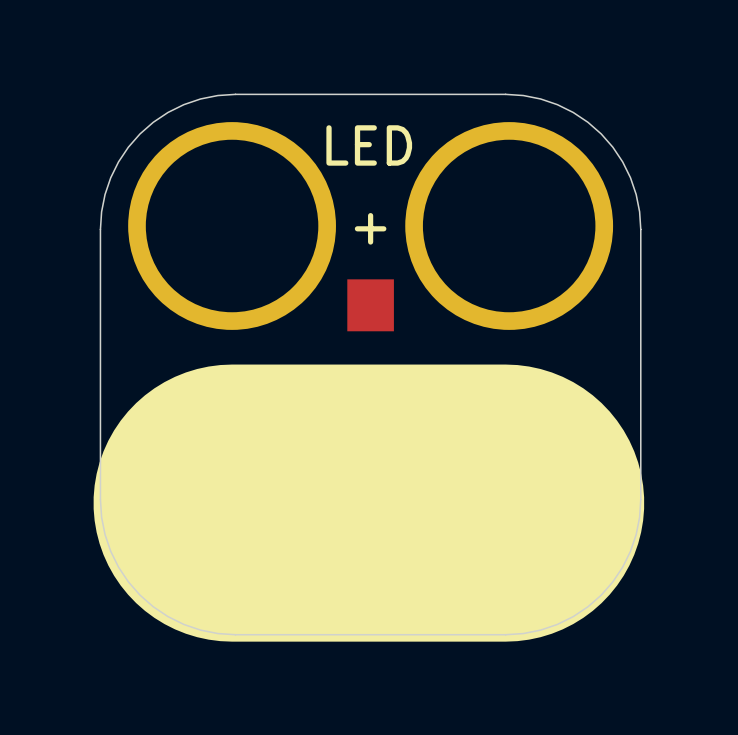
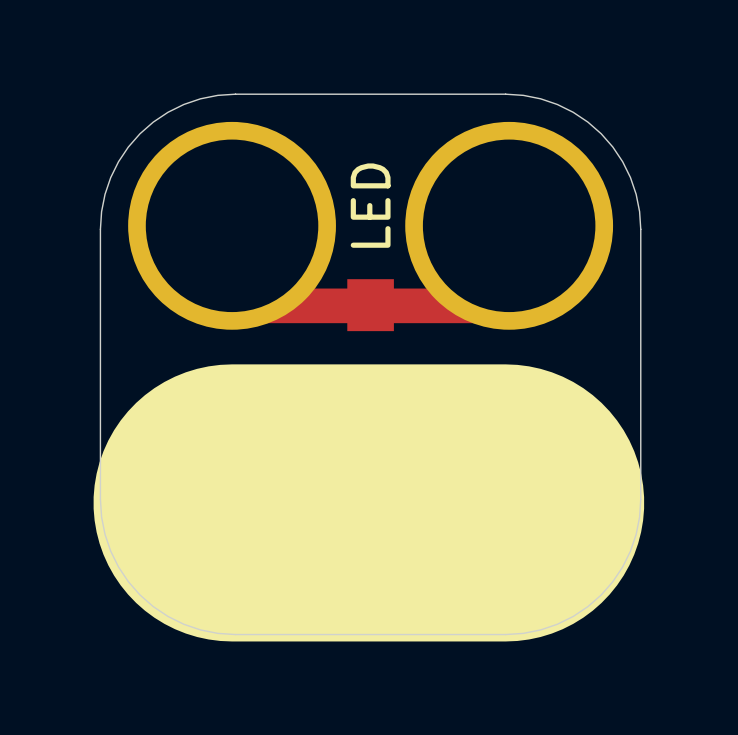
part footprint: [93, 93, 645, 642] -> [93, 93, 645, 642]
text: LED (369, 145) -> none

